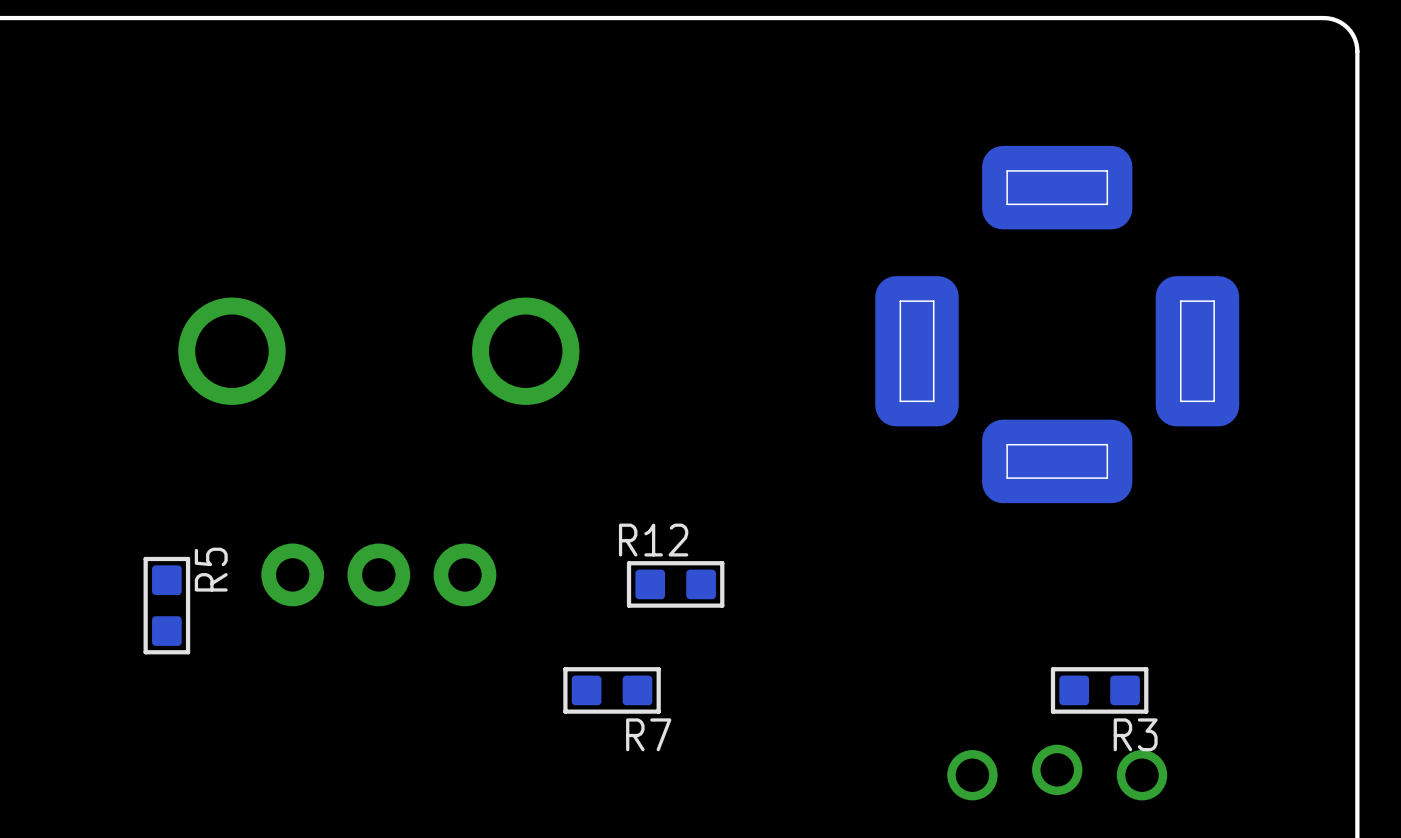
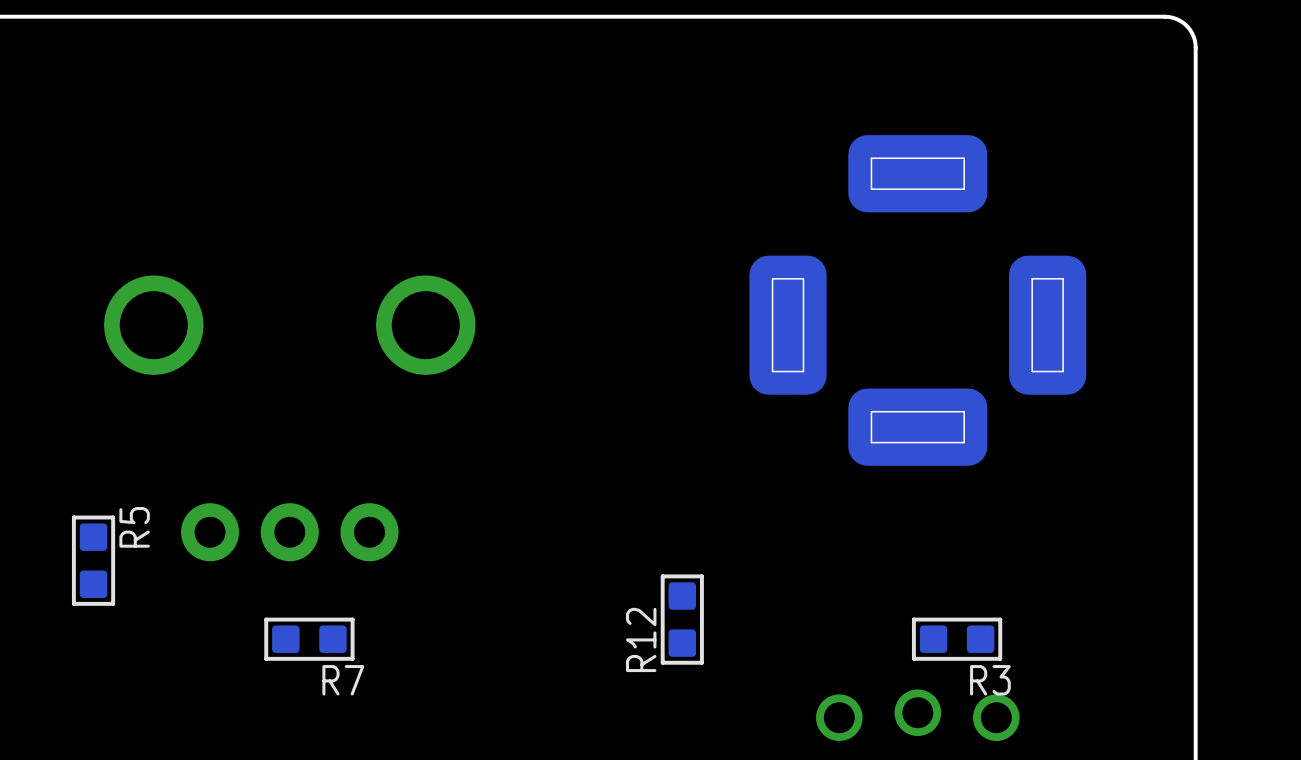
R12 rotation: 0° (675, 584) -> 90° clockwise (682, 619)
R12 position: (675, 584) -> (682, 619)
R7 position: (612, 690) -> (309, 639)

